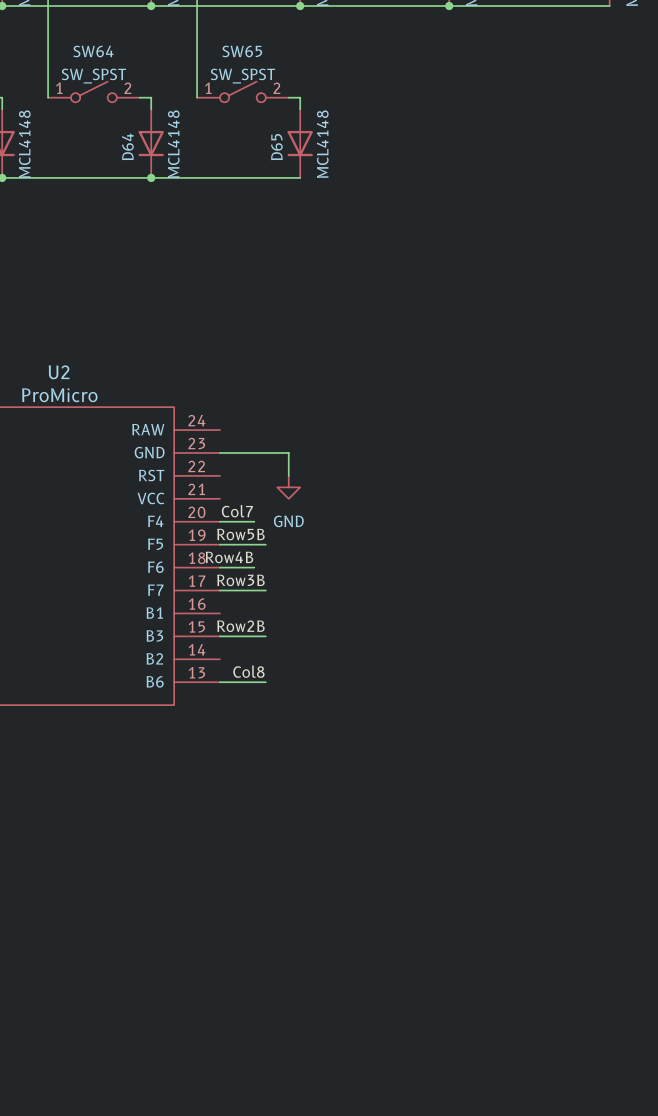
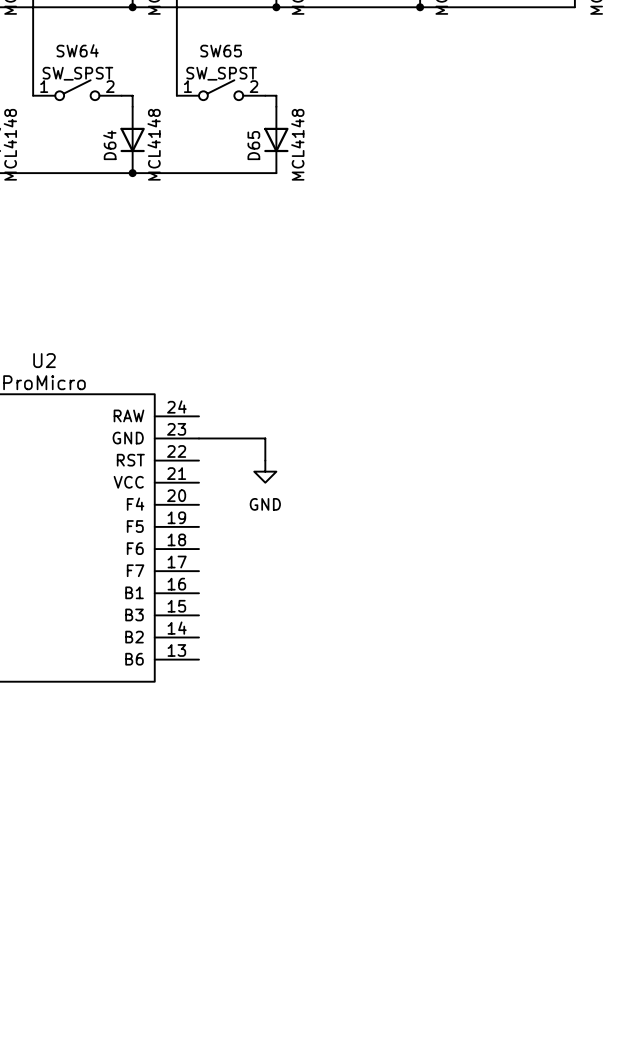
label: Col7 (237, 511) -> none
wire: (219, 521) (254, 521) -> none
label: Row5B (240, 534) -> none
wire: (219, 544) (265, 544) -> none
label: Row4B (229, 557) -> none
wire: (219, 567) (254, 567) -> none
label: Row3B (240, 580) -> none
wire: (219, 590) (265, 590) -> none
label: Row2B (240, 626) -> none
wire: (219, 636) (265, 636) -> none
label: Col8 (248, 671) -> none
wire: (219, 682) (265, 682) -> none

